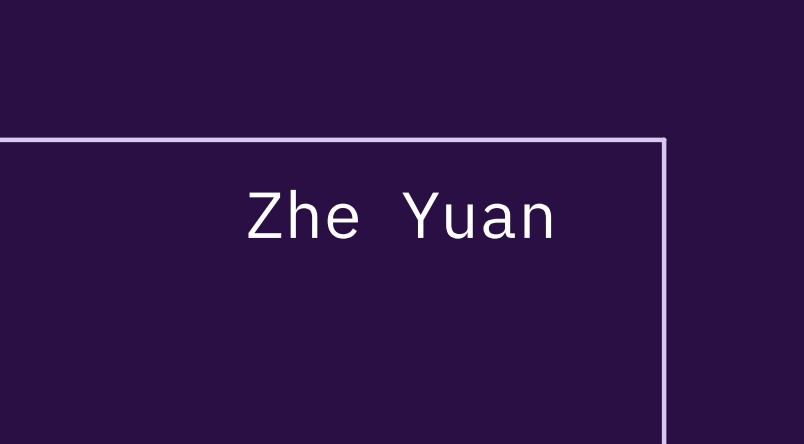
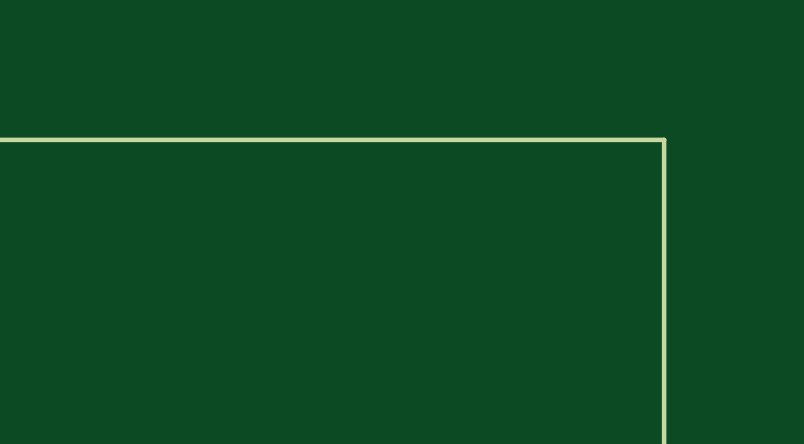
text: Zhe Yuan (399, 214) -> none

